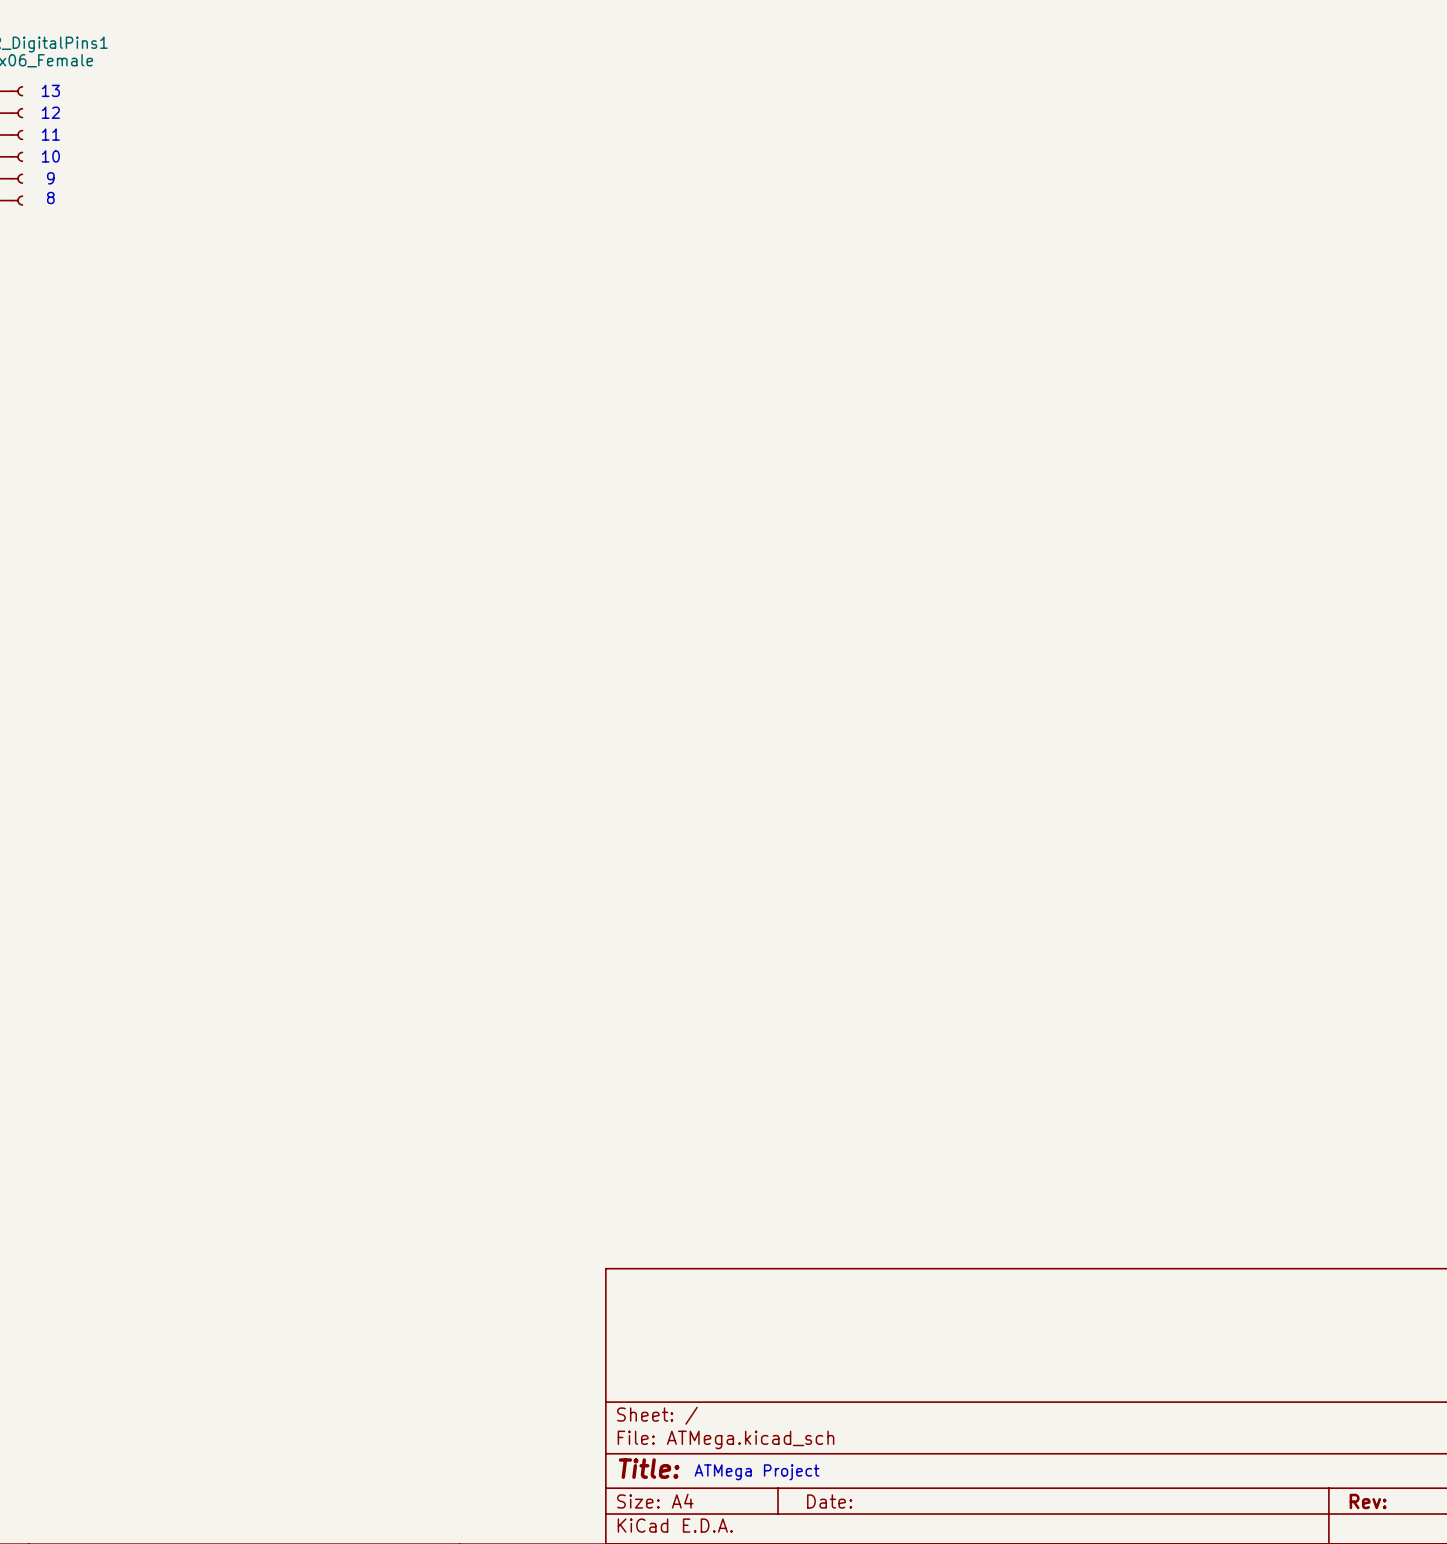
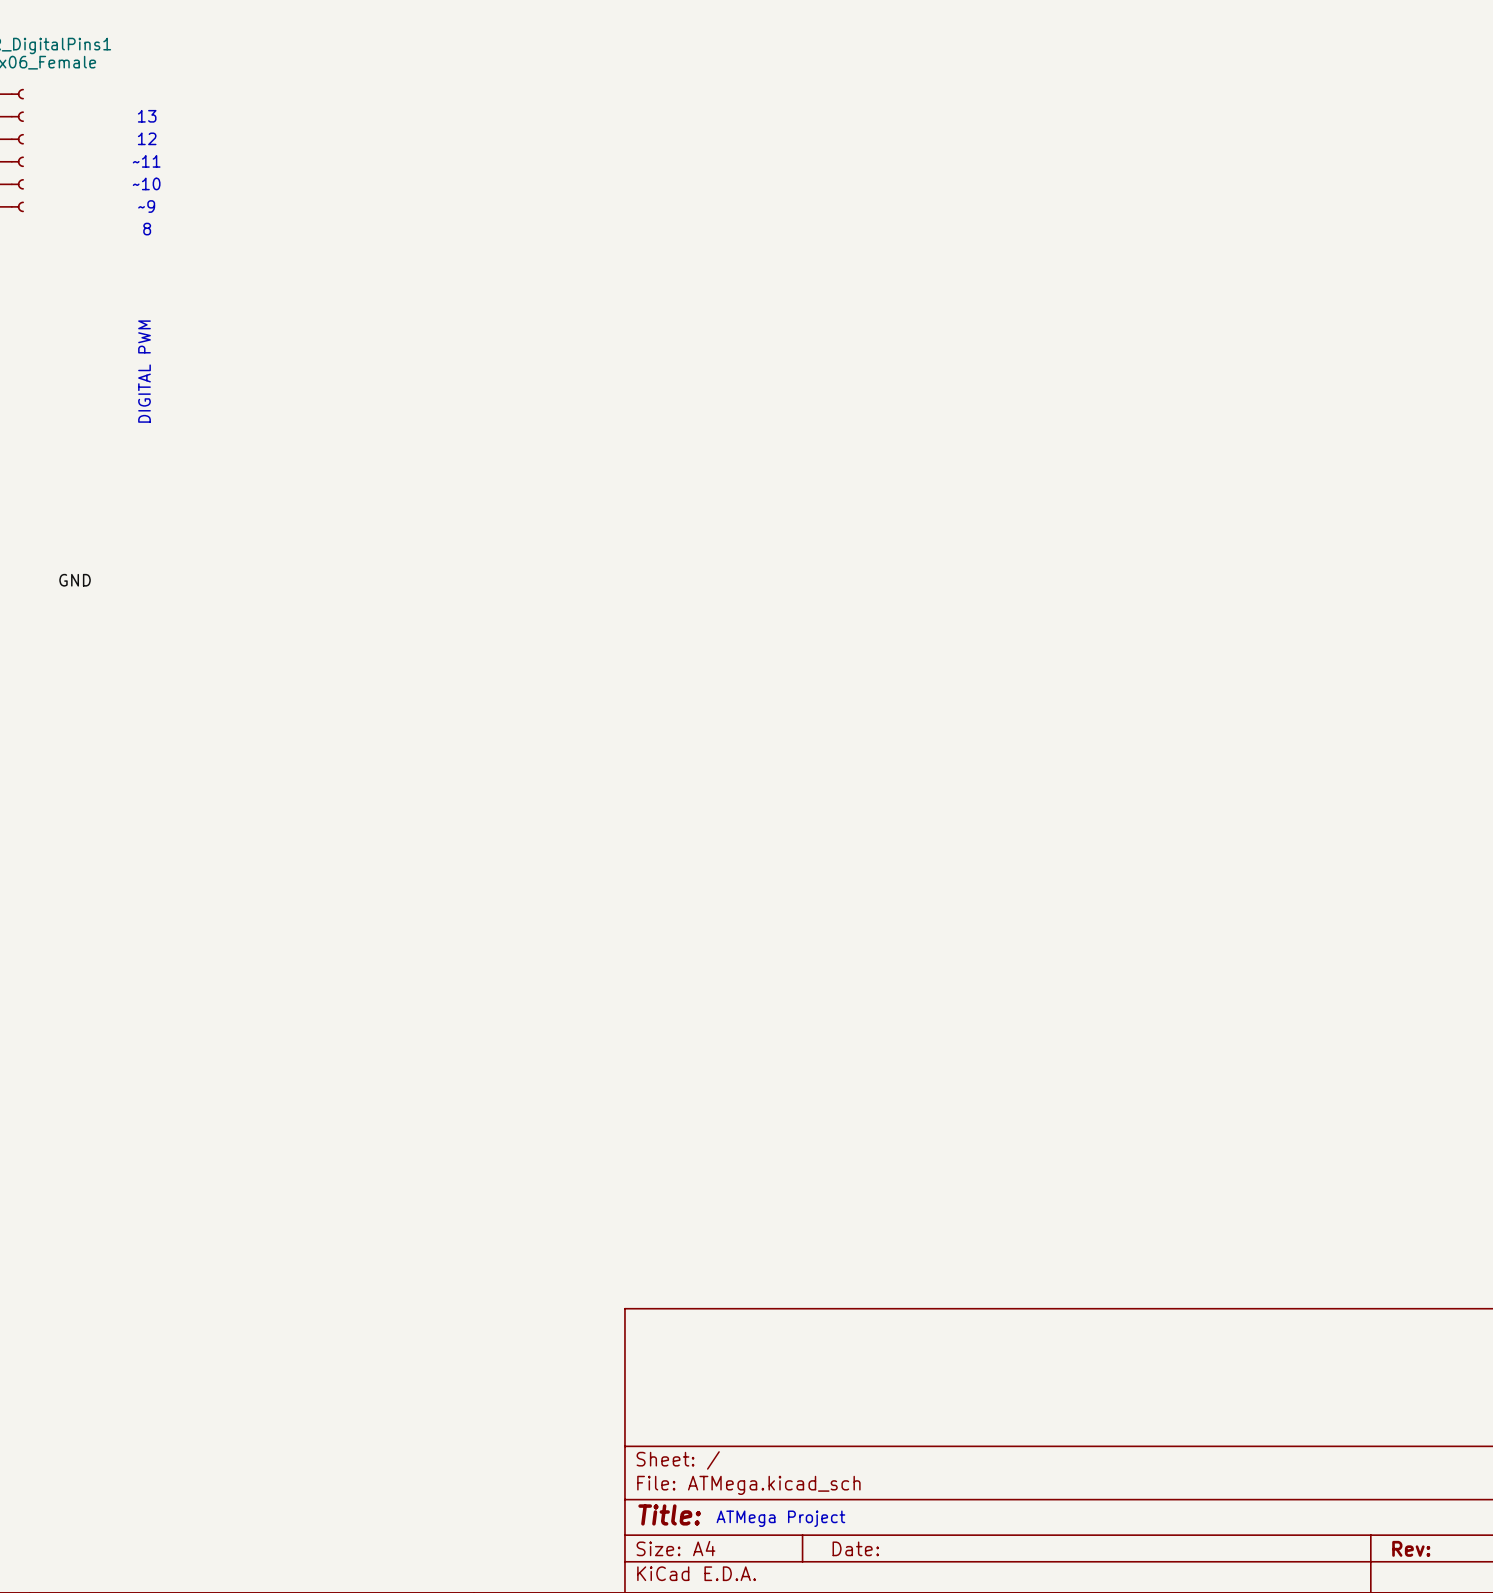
text position: 13 (50, 90) -> 13 (147, 116)
text position: 12 (50, 112) -> 12 (147, 138)
text: 11 (50, 134) -> none
text: 10 (50, 156) -> none
text: none -> ~11 (146, 161)
text: 9 (50, 178) -> none
text: none -> ~10 (146, 183)
text position: 8 (50, 198) -> 8 (147, 229)
text: none -> ~9 (146, 206)
text: none -> DIGITAL PWM (144, 371)
label: none -> GND (75, 580)

